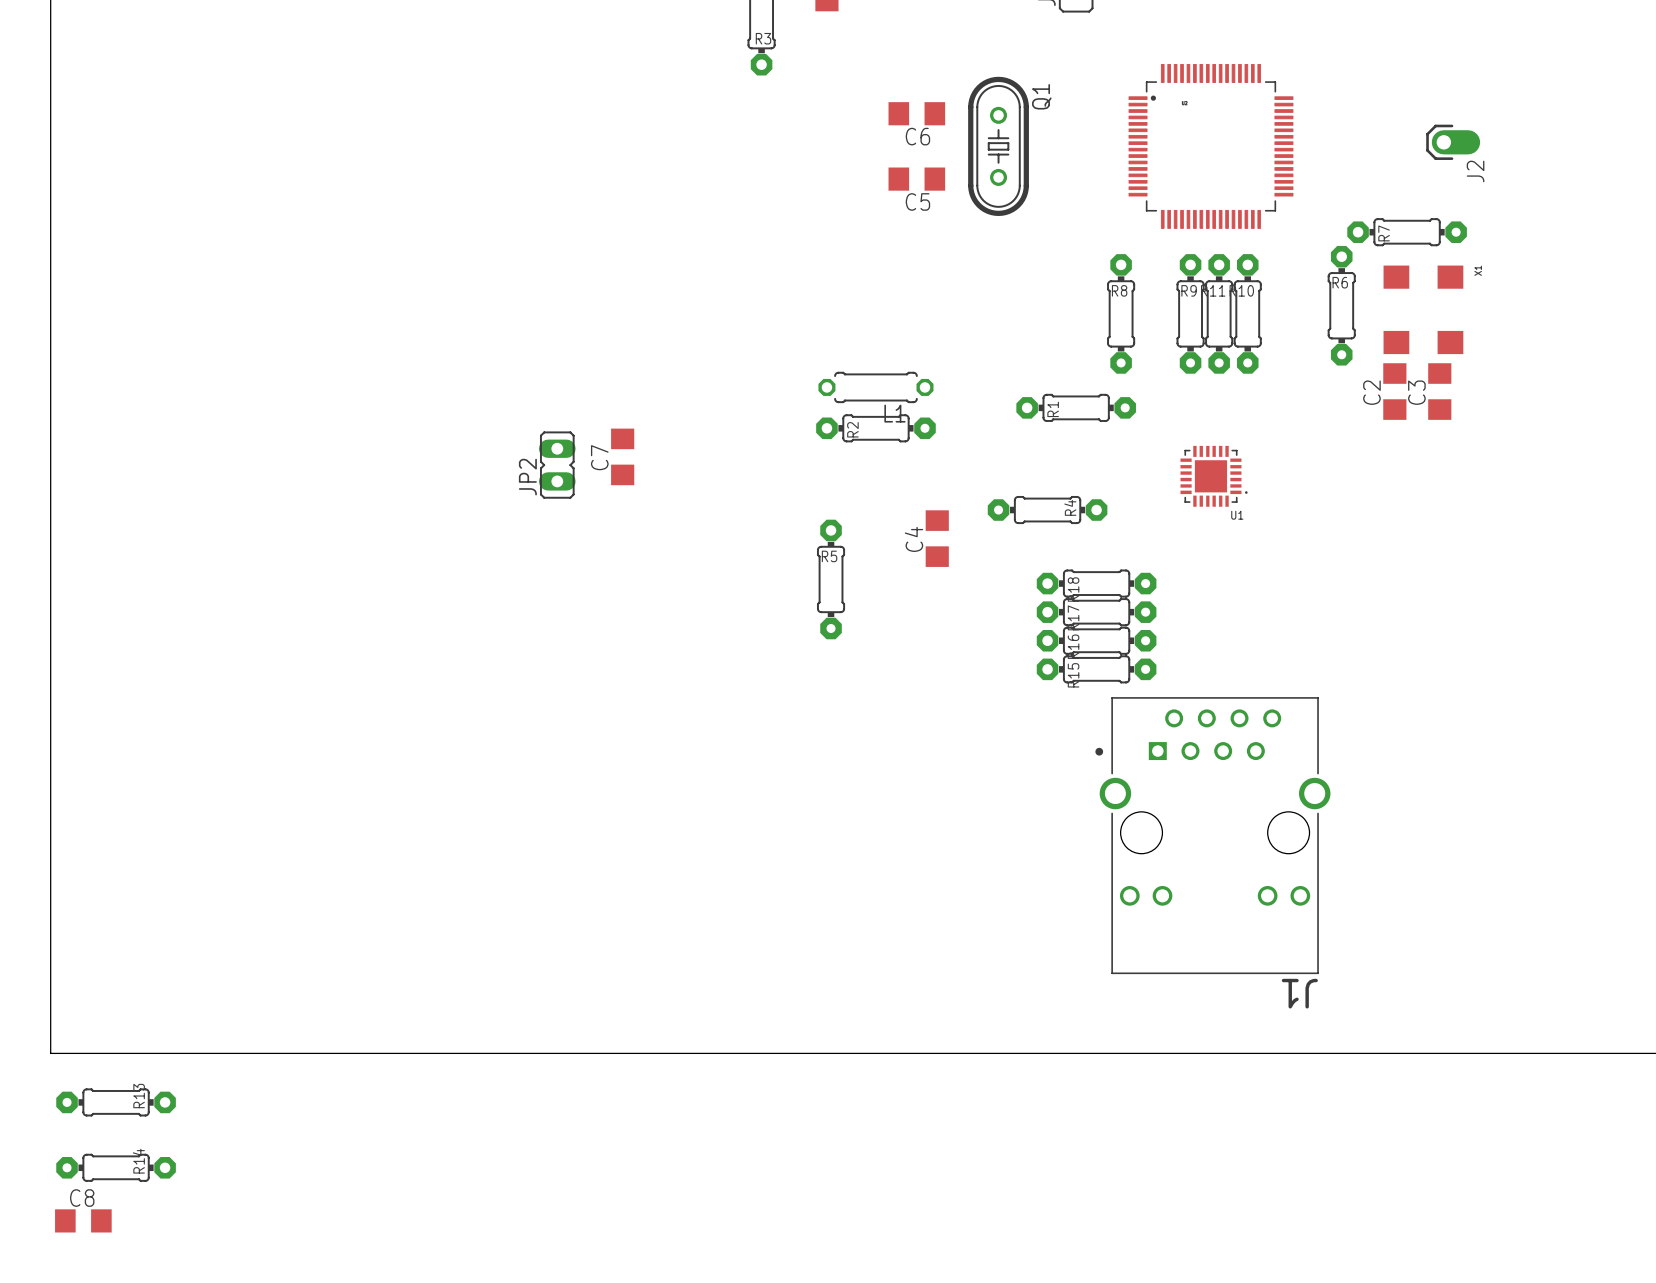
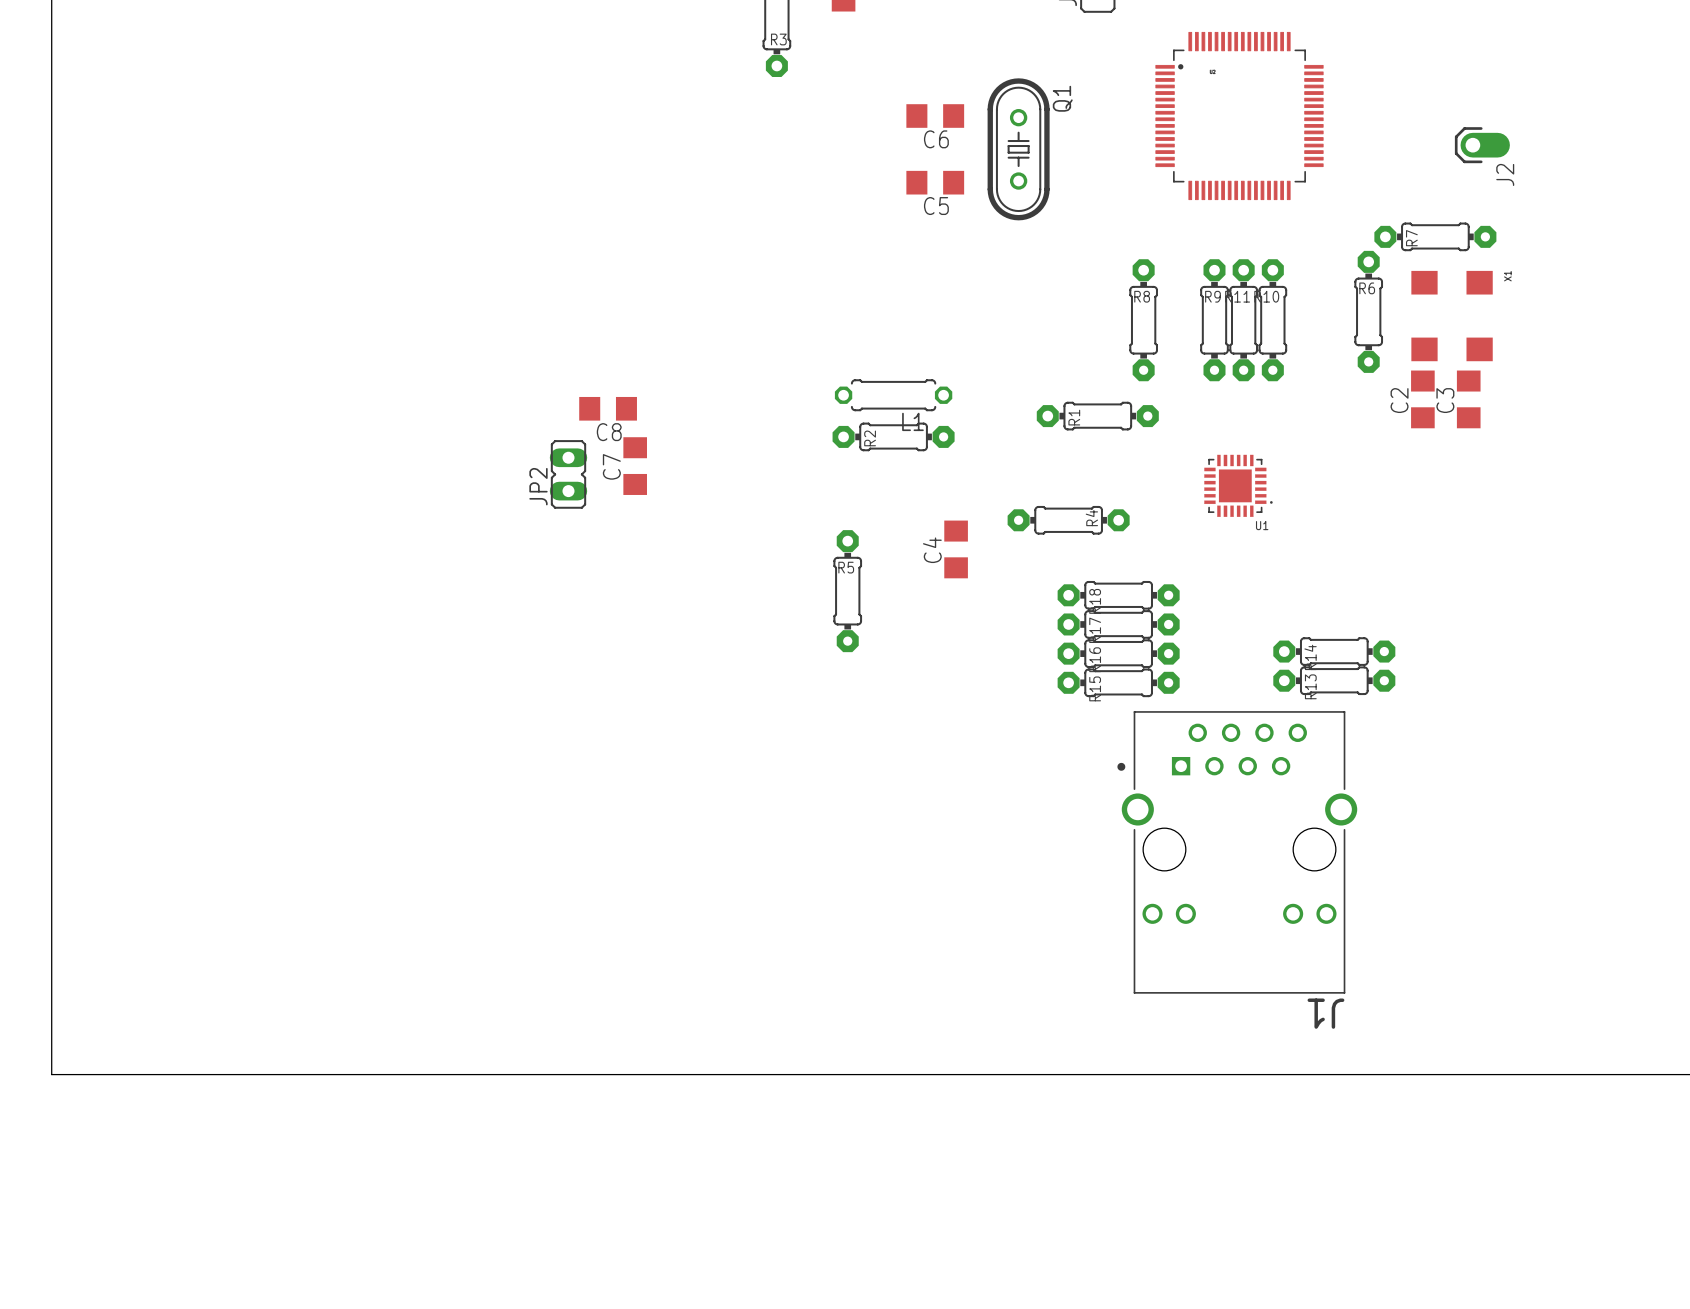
part position: (1210, 146) -> (1239, 116)
R13 rotation: 0° (116, 1102) -> 180° (1334, 680)
R13 position: (116, 1102) -> (1334, 680)
R14 rotation: 0° (116, 1167) -> 180° (1334, 651)
R14 position: (116, 1167) -> (1334, 651)
C8 name position: C8 (82, 1198) -> C8 (609, 432)
C8 position: (83, 1220) -> (608, 408)

